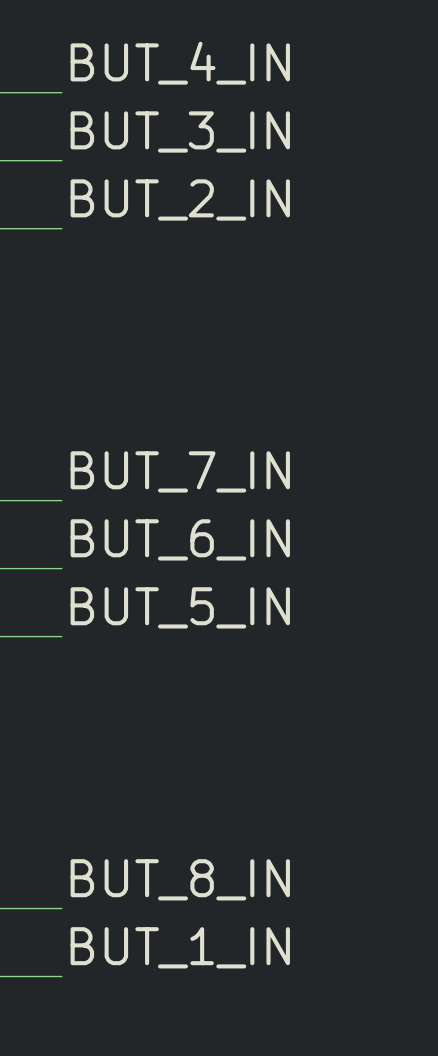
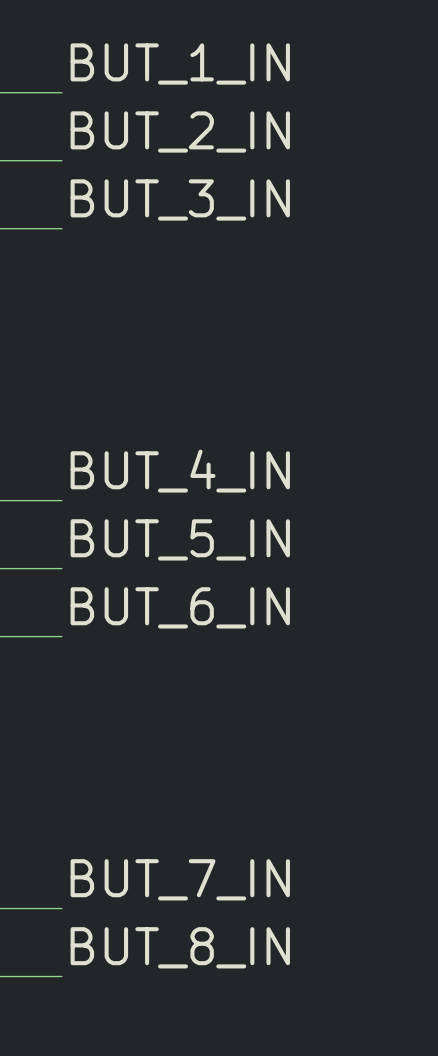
label: BUT_4_IN (180, 63) -> BUT_1_IN (180, 63)
label: BUT_3_IN (180, 131) -> BUT_2_IN (180, 131)
label: BUT_2_IN (180, 199) -> BUT_3_IN (180, 199)
label: BUT_7_IN (180, 471) -> BUT_4_IN (180, 471)
label: BUT_6_IN (180, 539) -> BUT_5_IN (180, 539)
label: BUT_5_IN (180, 607) -> BUT_6_IN (180, 607)
label: BUT_8_IN (180, 879) -> BUT_7_IN (180, 879)
label: BUT_1_IN (180, 947) -> BUT_8_IN (180, 947)

